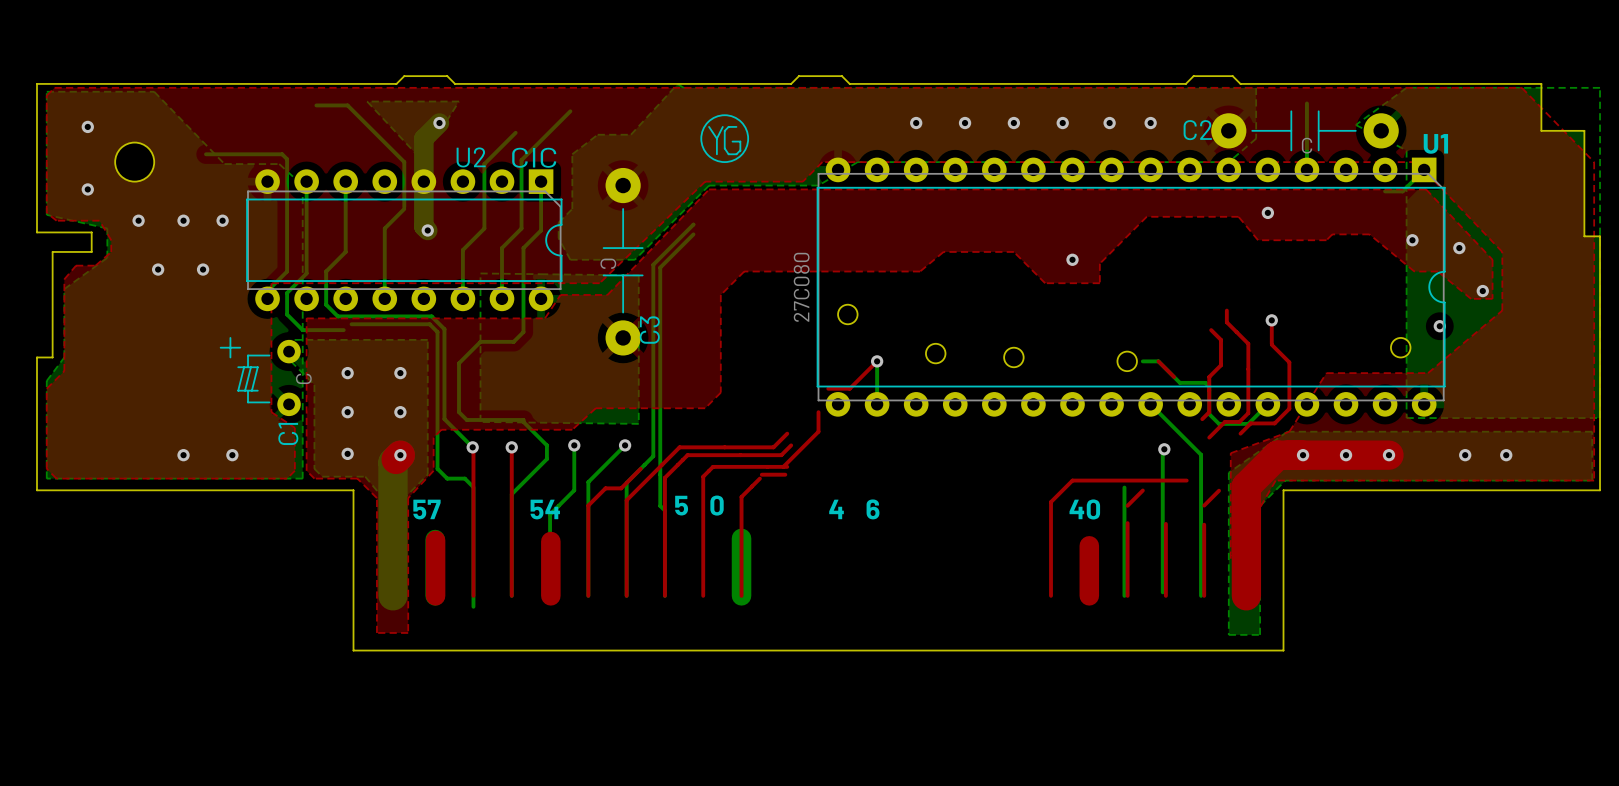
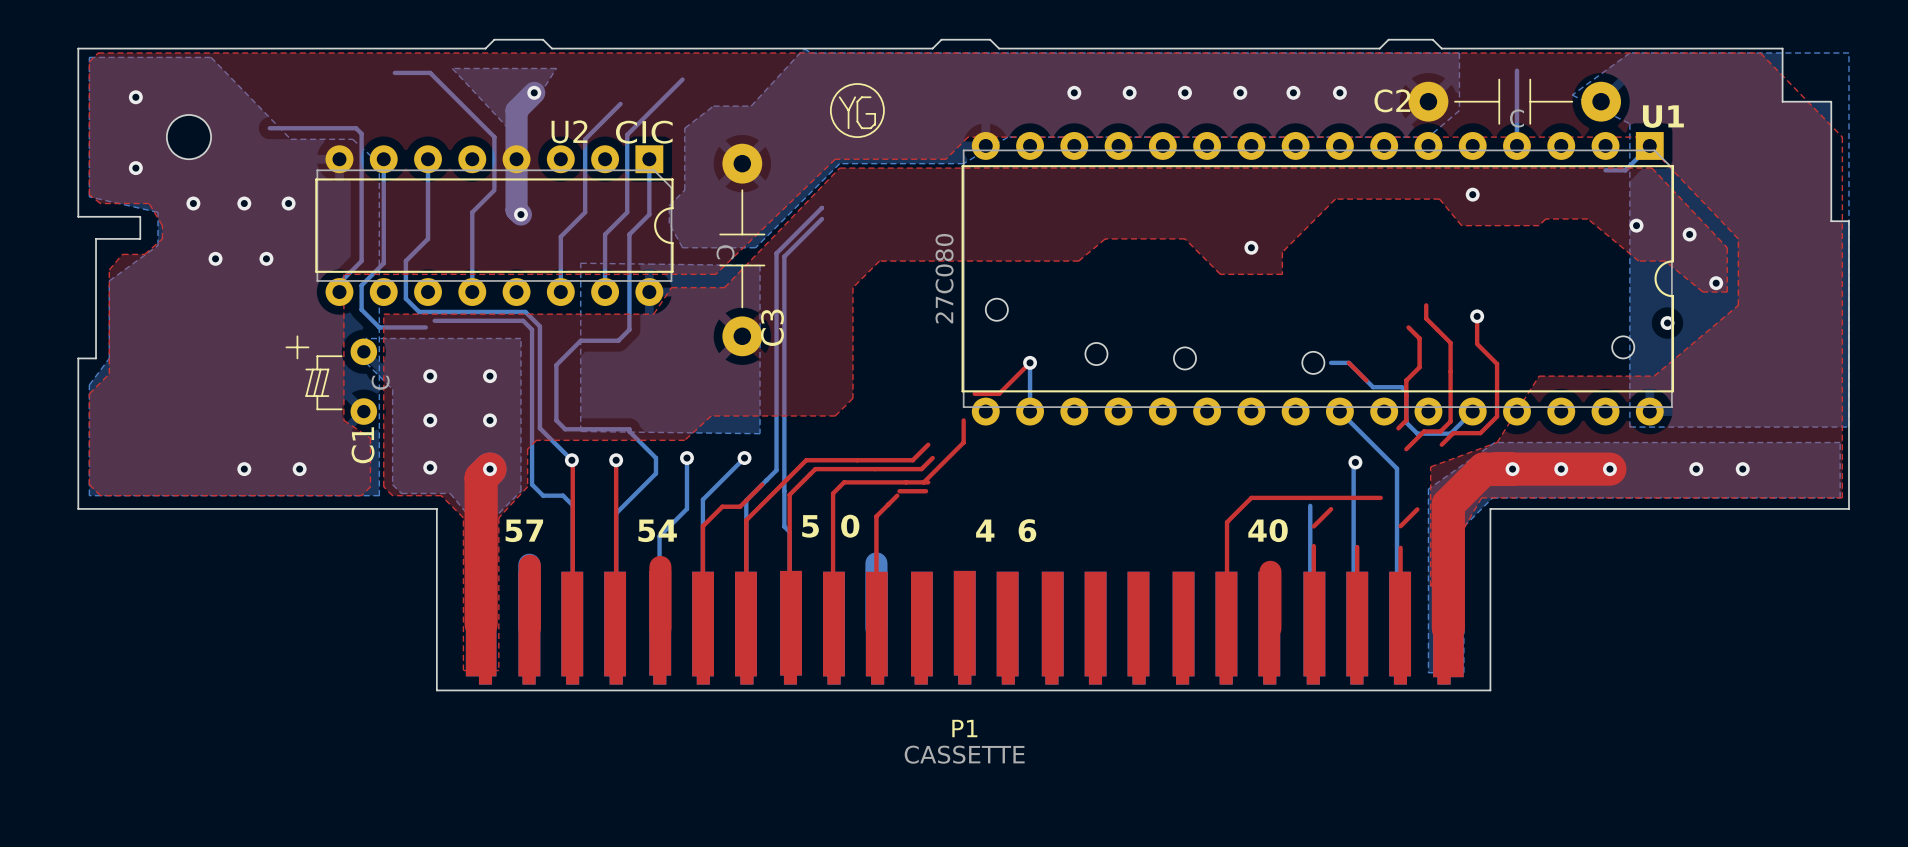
top track: none -> (485, 473) (481, 477) (481, 624)
bottom track: (392, 462) (392, 595) -> none
P1: none -> CASSETTE (964, 627)

